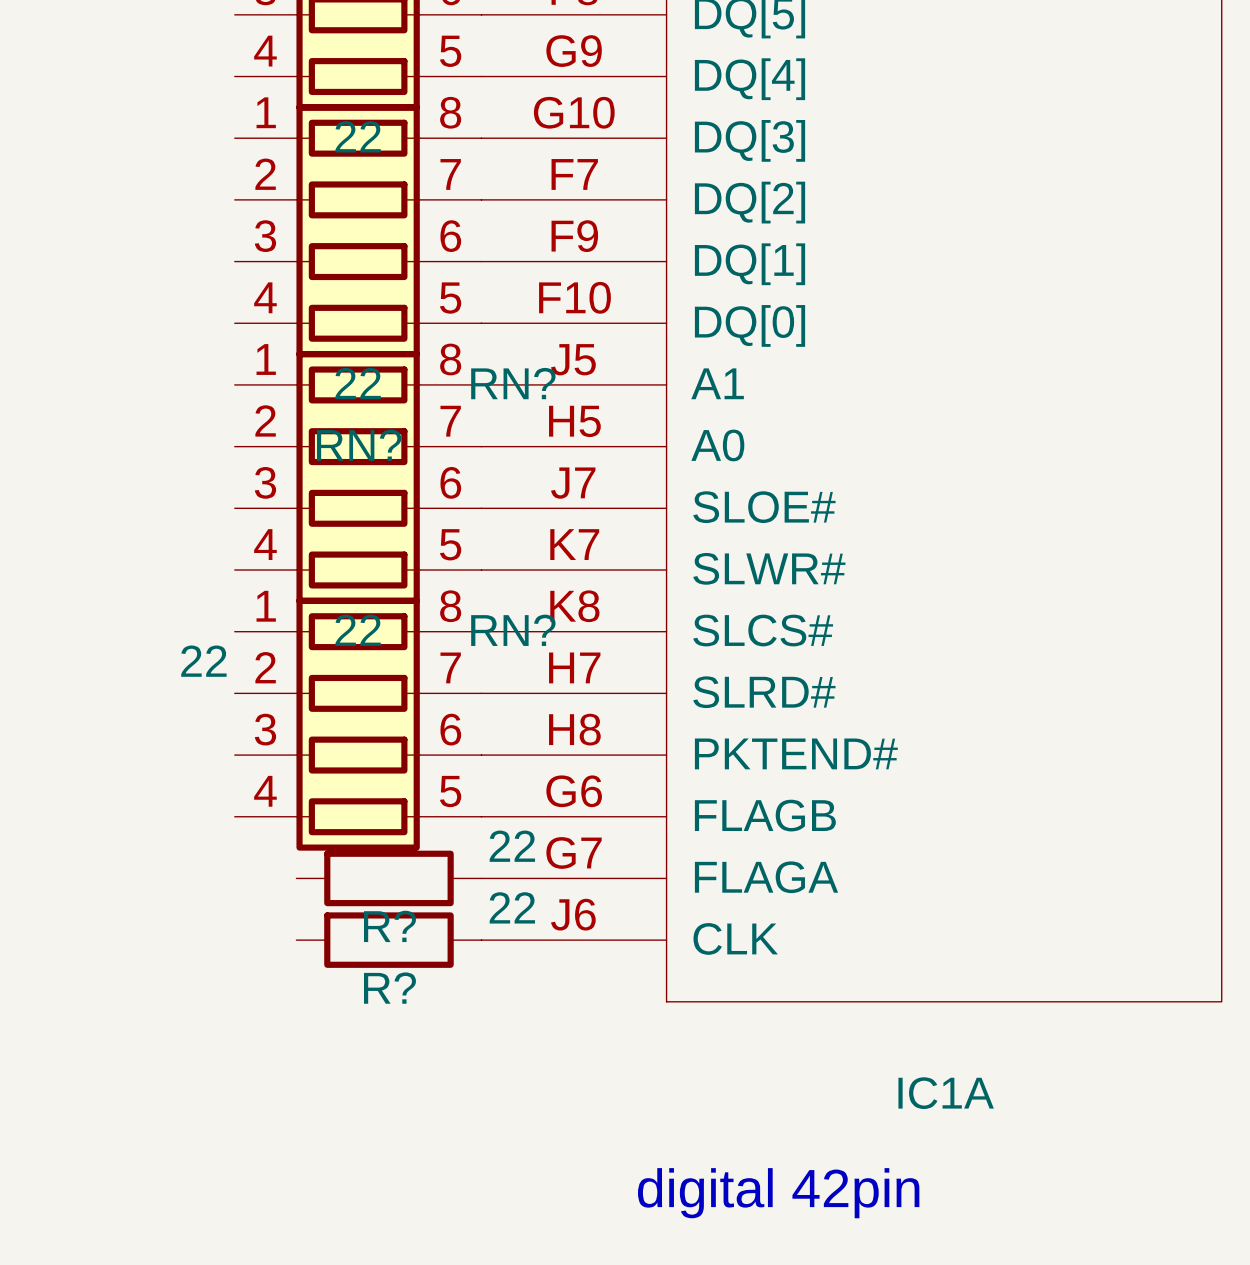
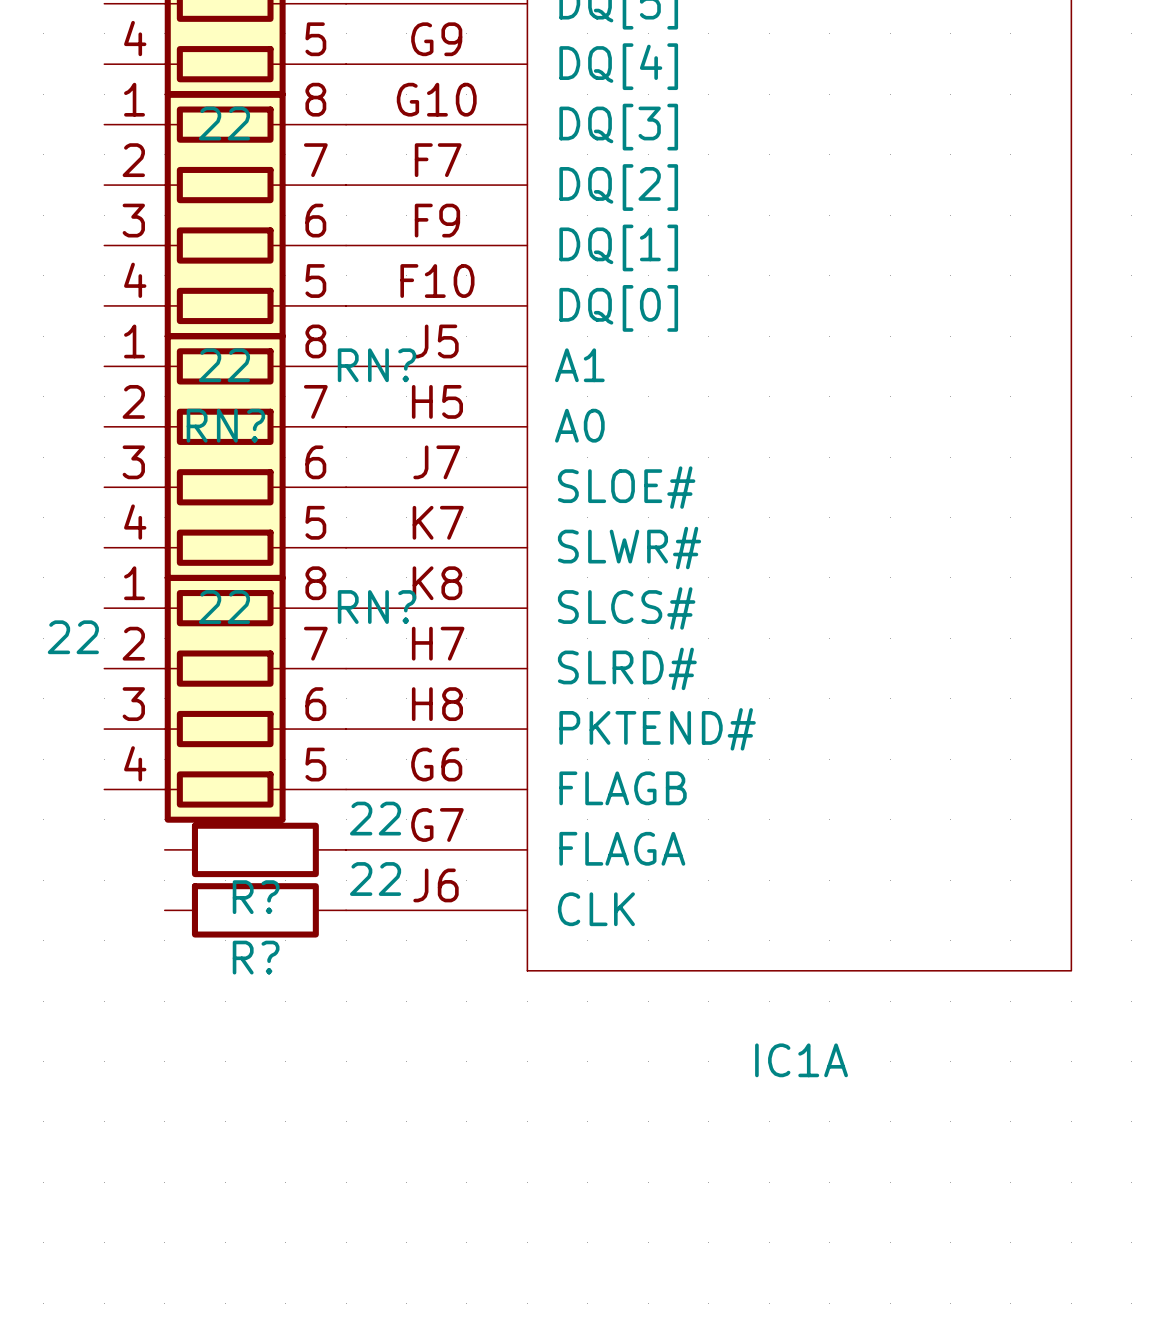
text: digital 42pin (778, 1193) -> none

